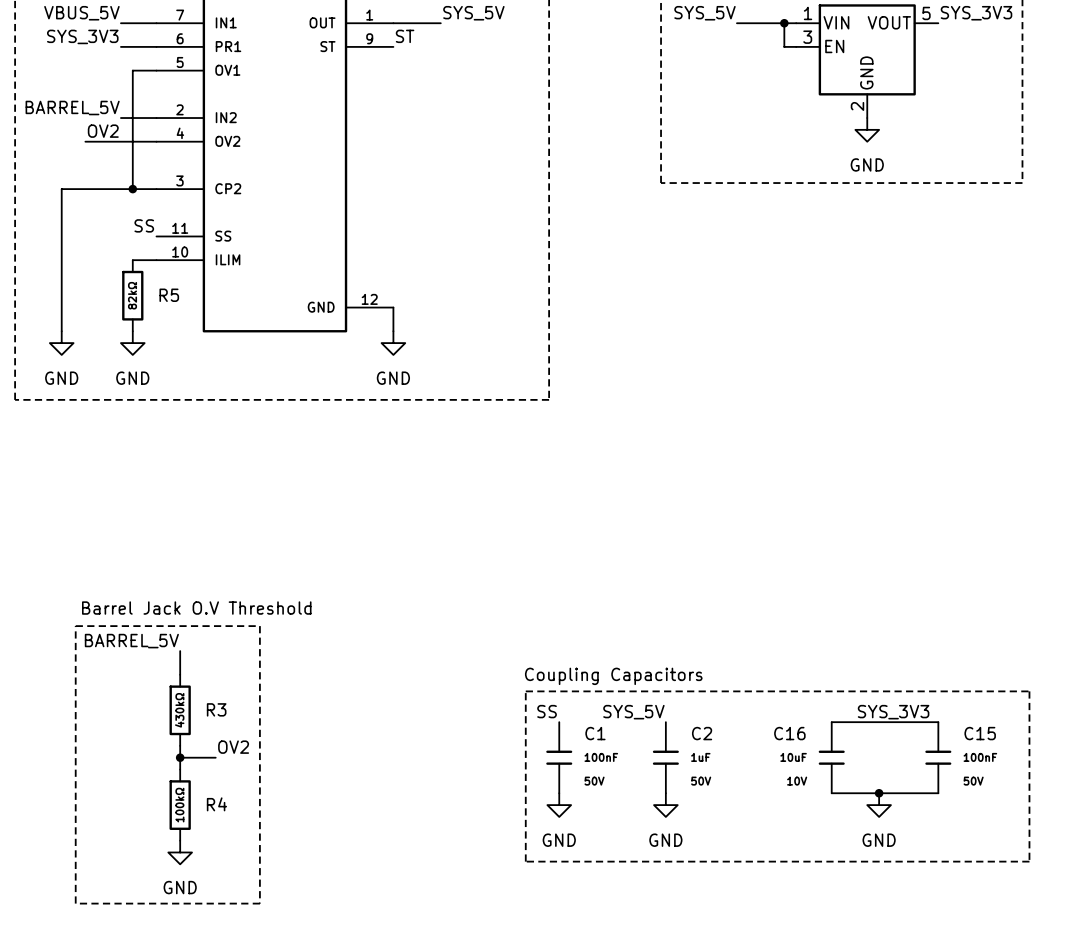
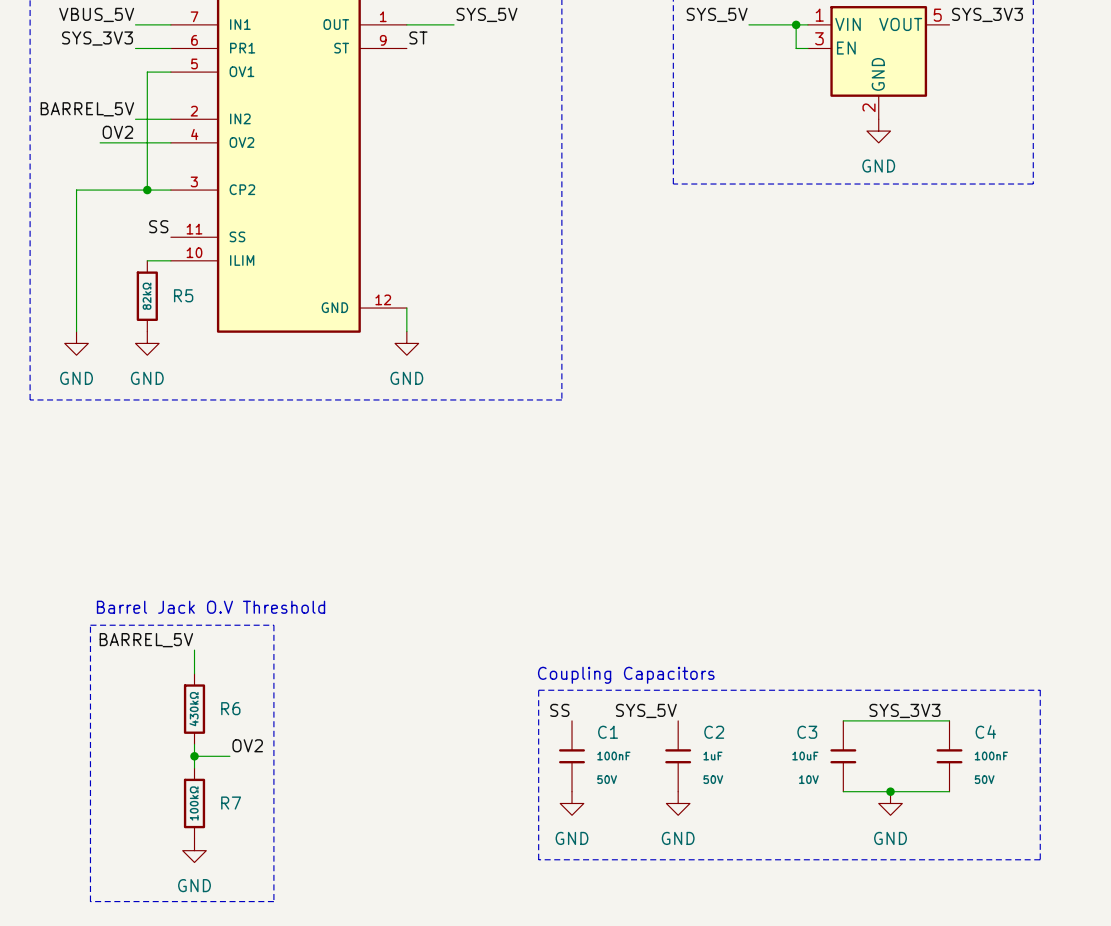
R3 name: R3 (216, 709) -> R6 (230, 708)
C16 name: C16 (789, 733) -> C3 (807, 732)
C15 name: C15 (980, 733) -> C4 (985, 731)
R4 name: R4 (216, 804) -> R7 (231, 803)

